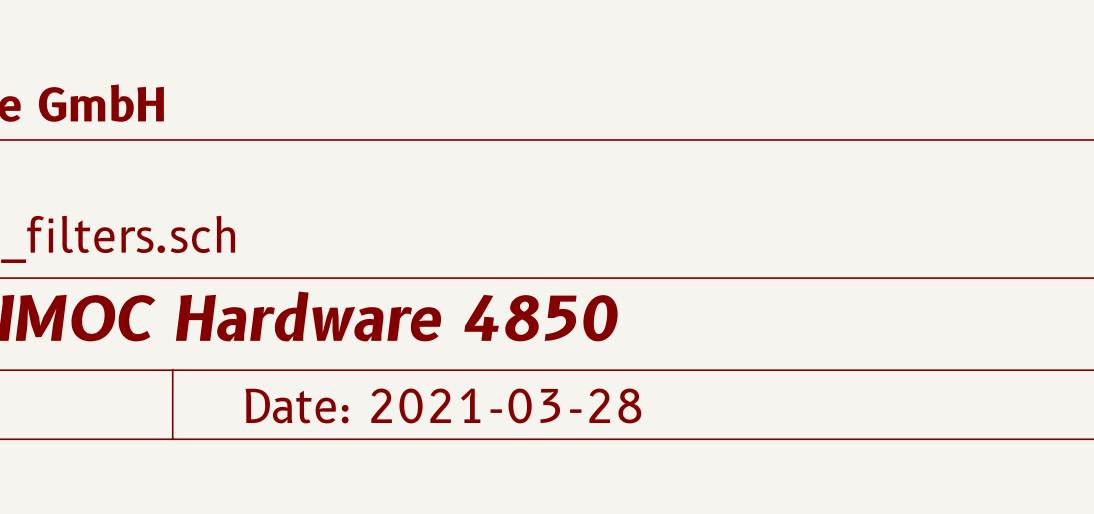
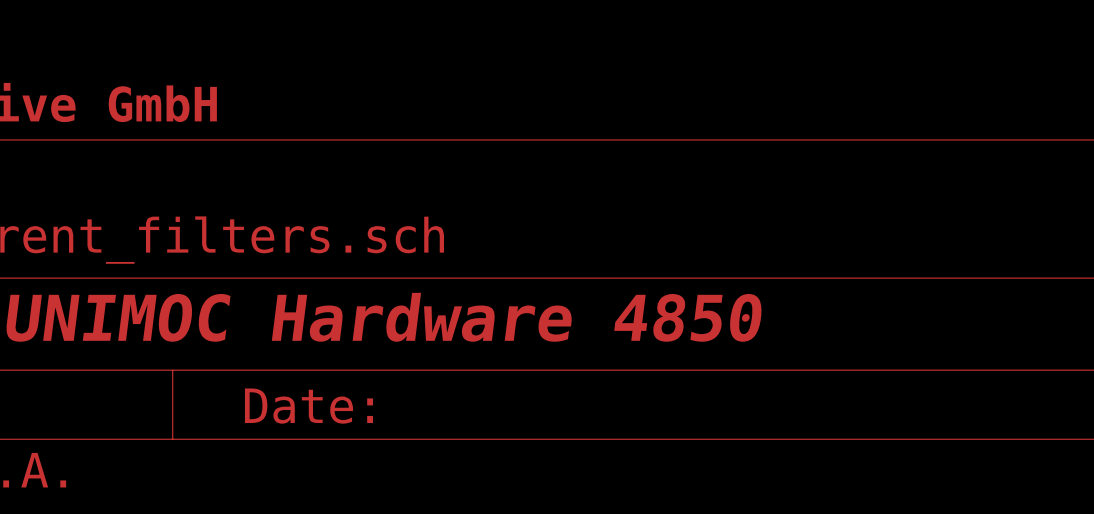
title block: Date: 2021-03-28 (443, 405) -> Date: (308, 406)

